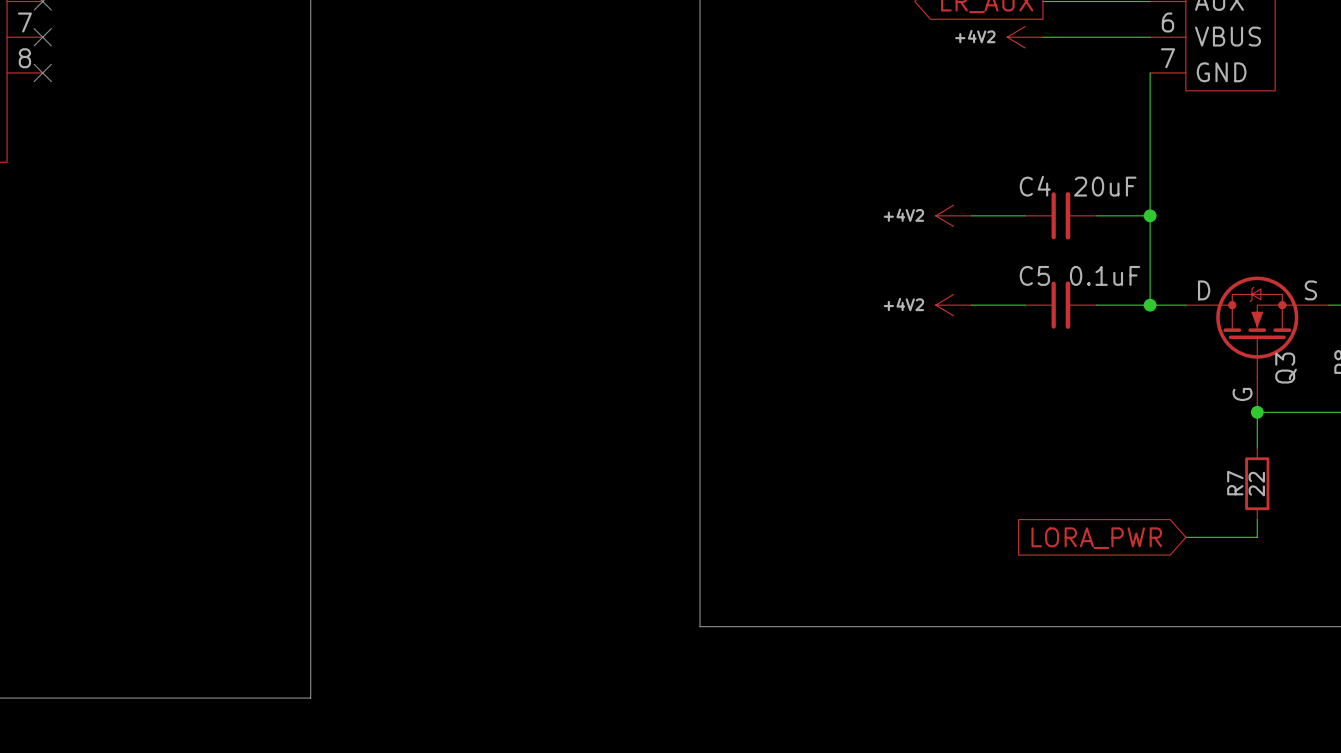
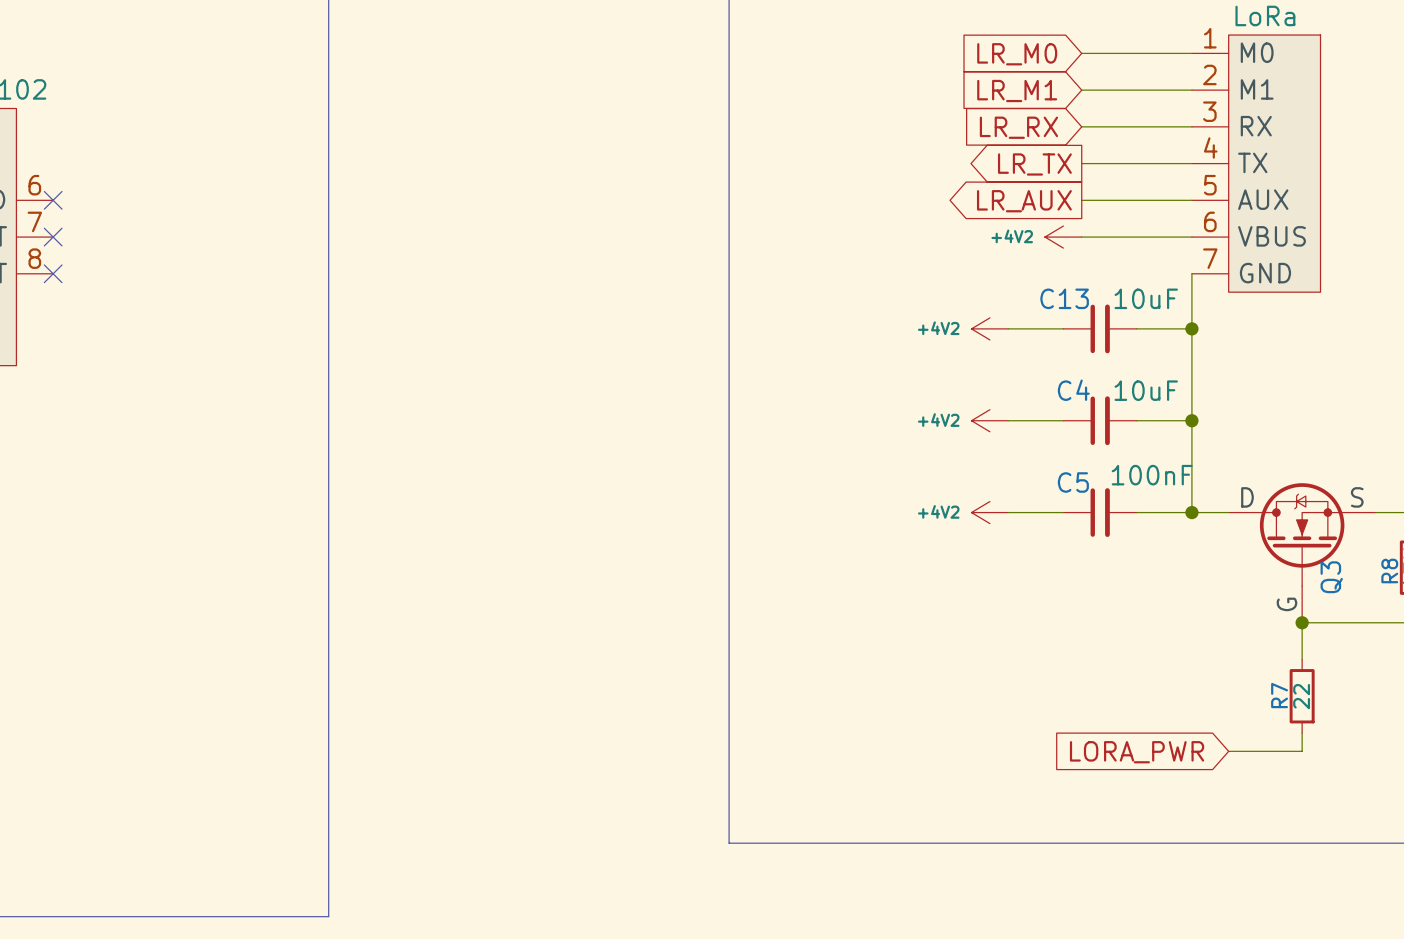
power symbol: none -> +4V2 (989, 328)
wire: none -> (1008, 328) (1063, 328)
C13: none -> 10uF (1100, 328)
wire: none -> (1136, 328) (1191, 328)
junction: none -> (1191, 328)
C4 value: 20uF (1105, 186) -> 10uF (1146, 390)
C5 value: 0.1uF (1105, 275) -> 100nF (1152, 475)

